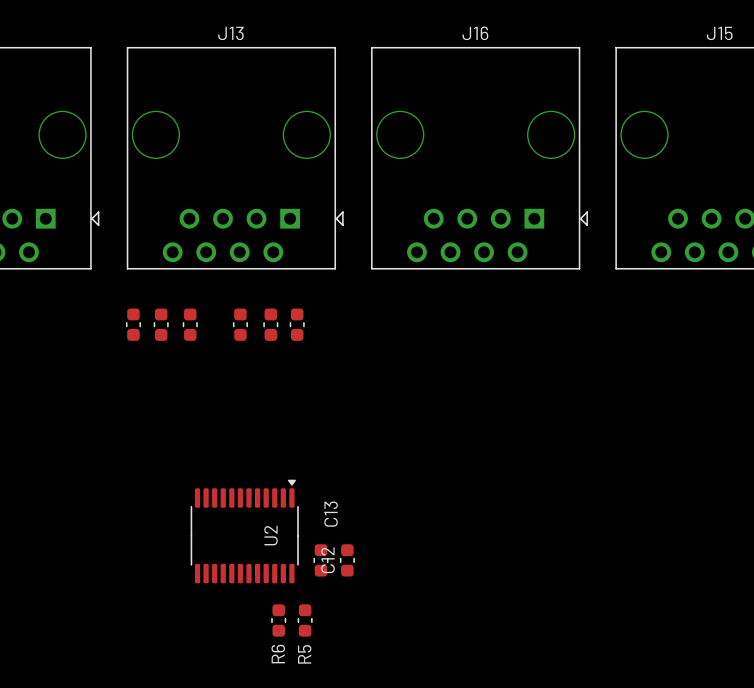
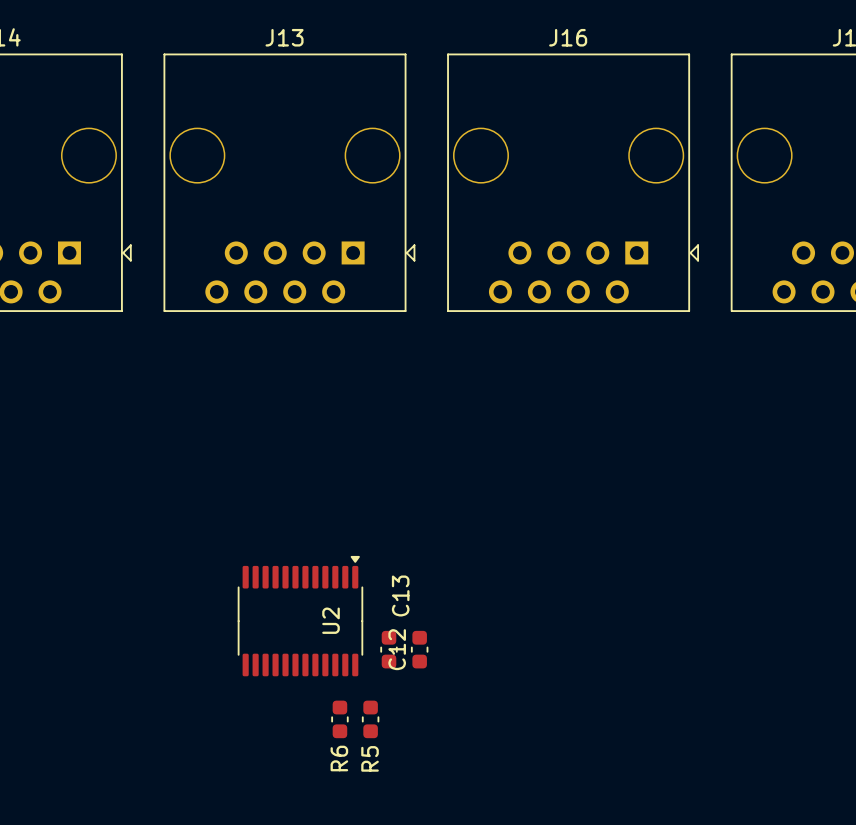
part: (133, 324) -> none
part: (161, 324) -> none
part: (190, 324) -> none
part: (240, 324) -> none
part: (270, 324) -> none
part: (297, 324) -> none

